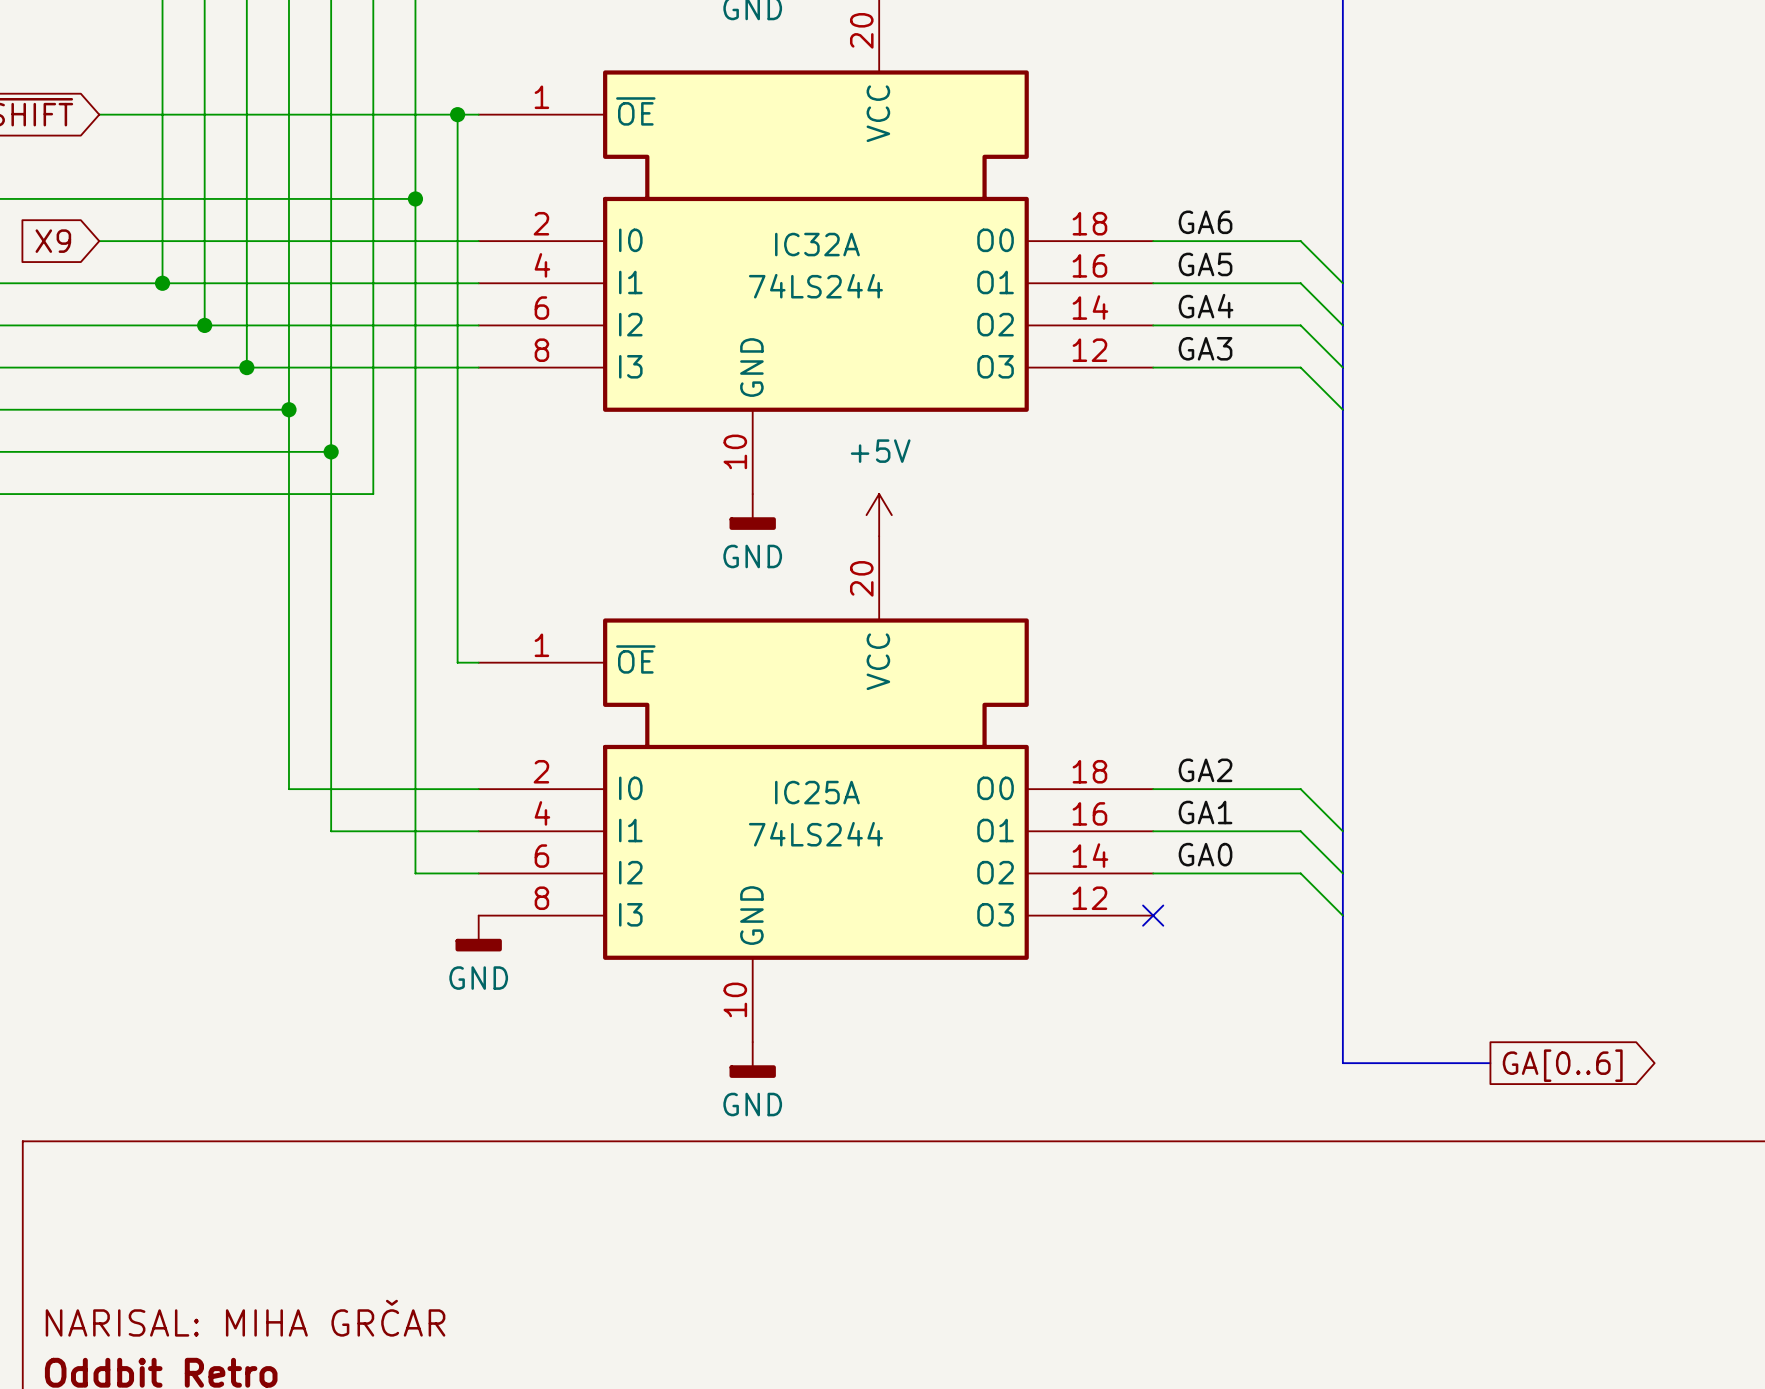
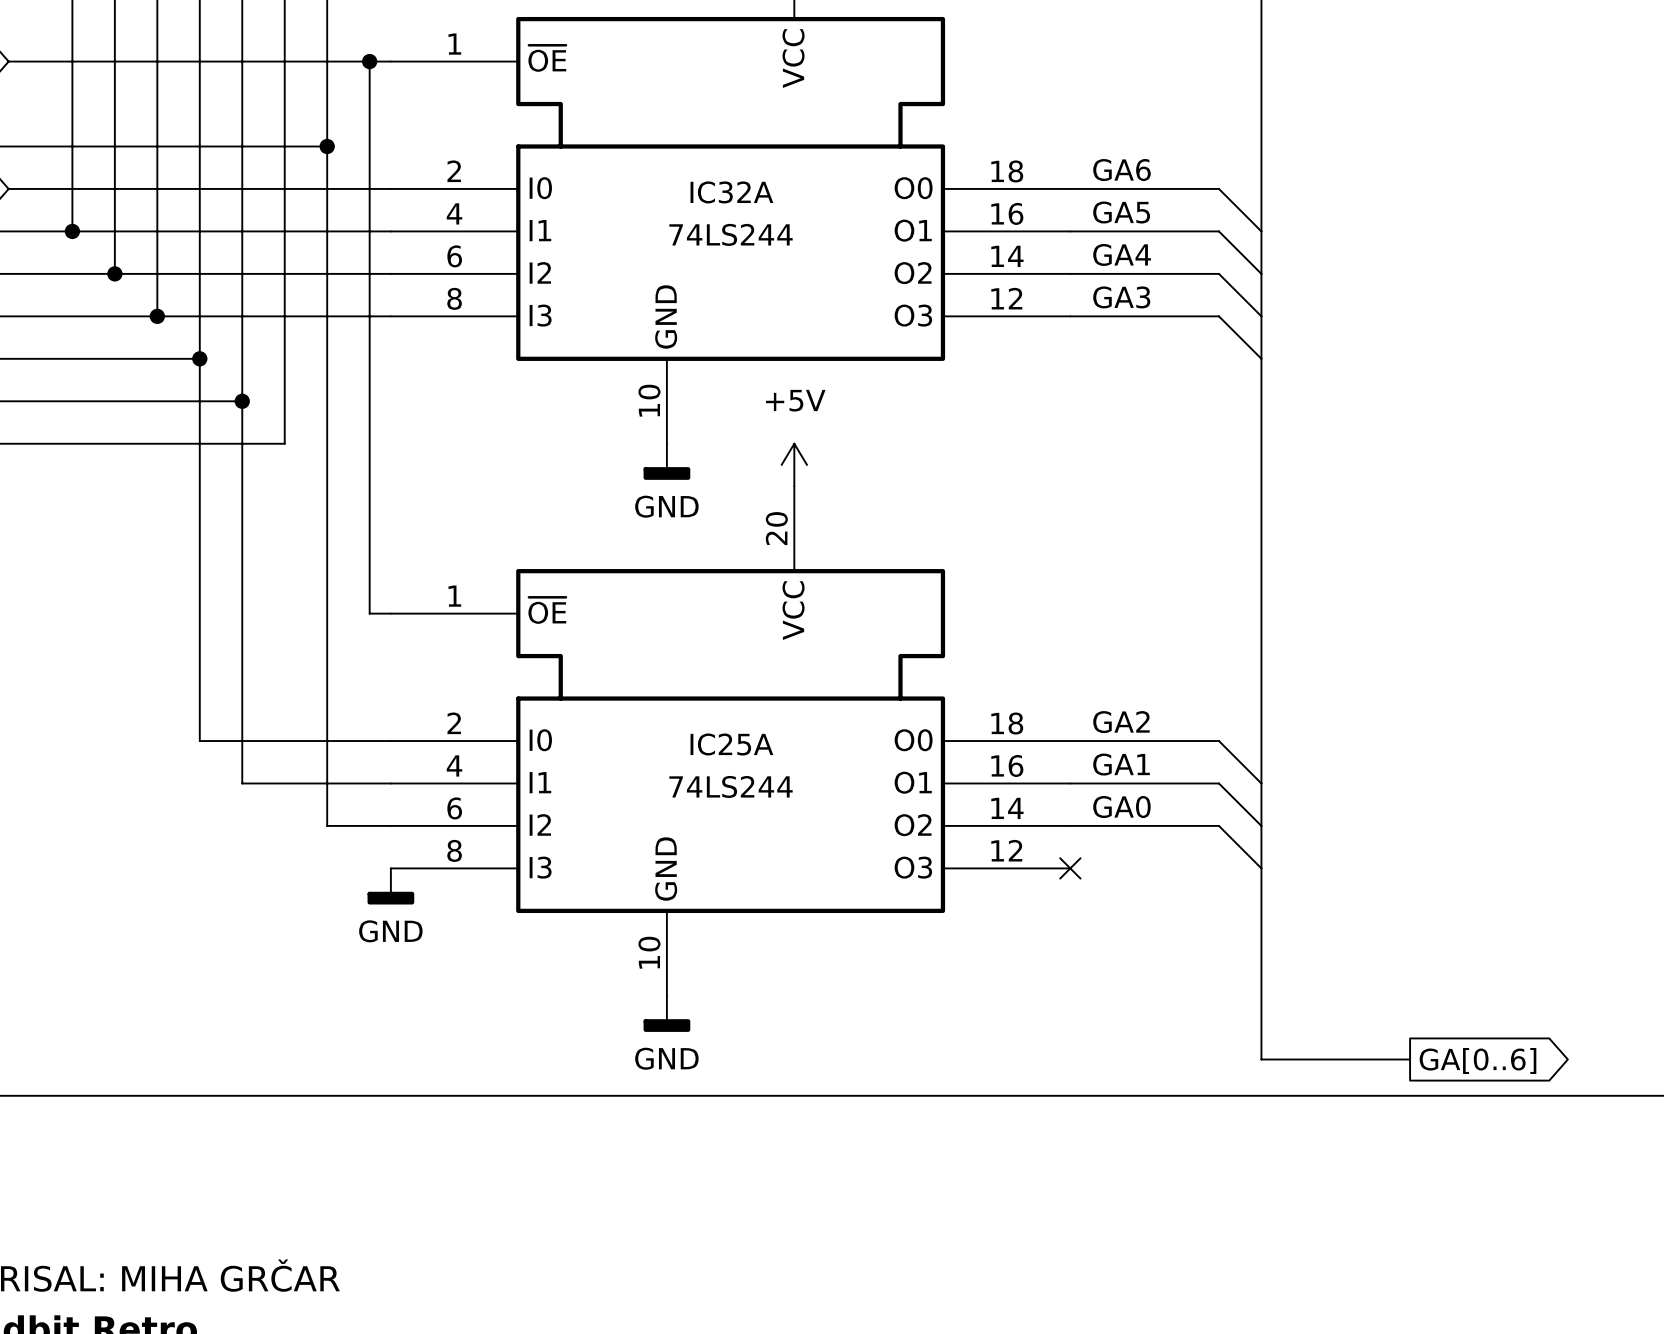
bus: (1342, 1063) (1490, 1063) -> (1261, 1017) (1261, 1059) (1410, 1059)
global label position: GA[0..6] (1562, 1065) -> GA[0..6] (1478, 1060)

